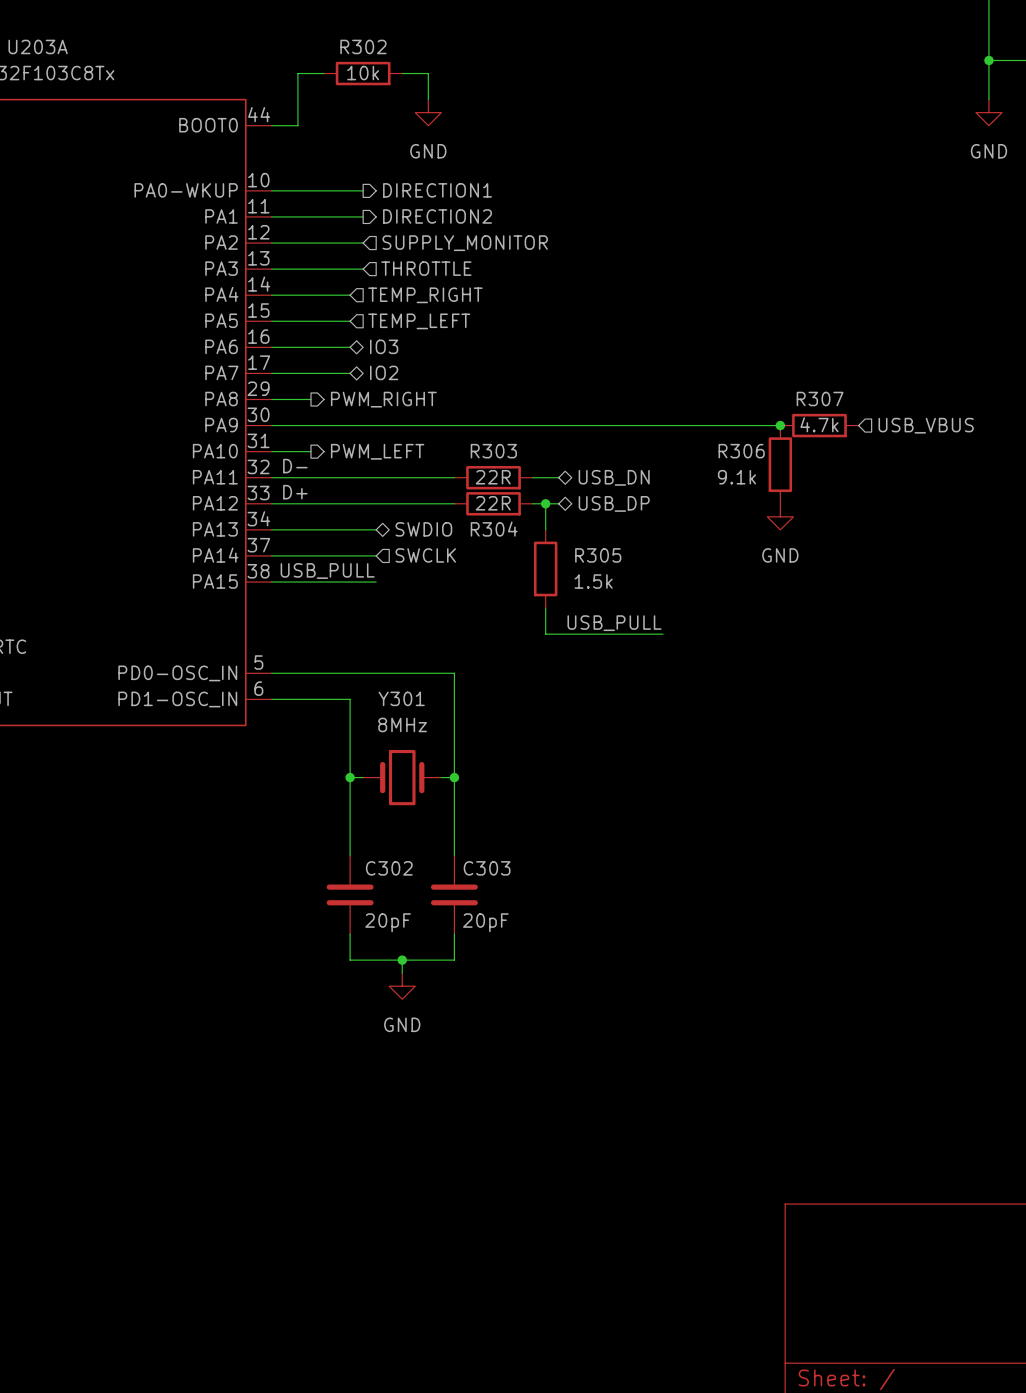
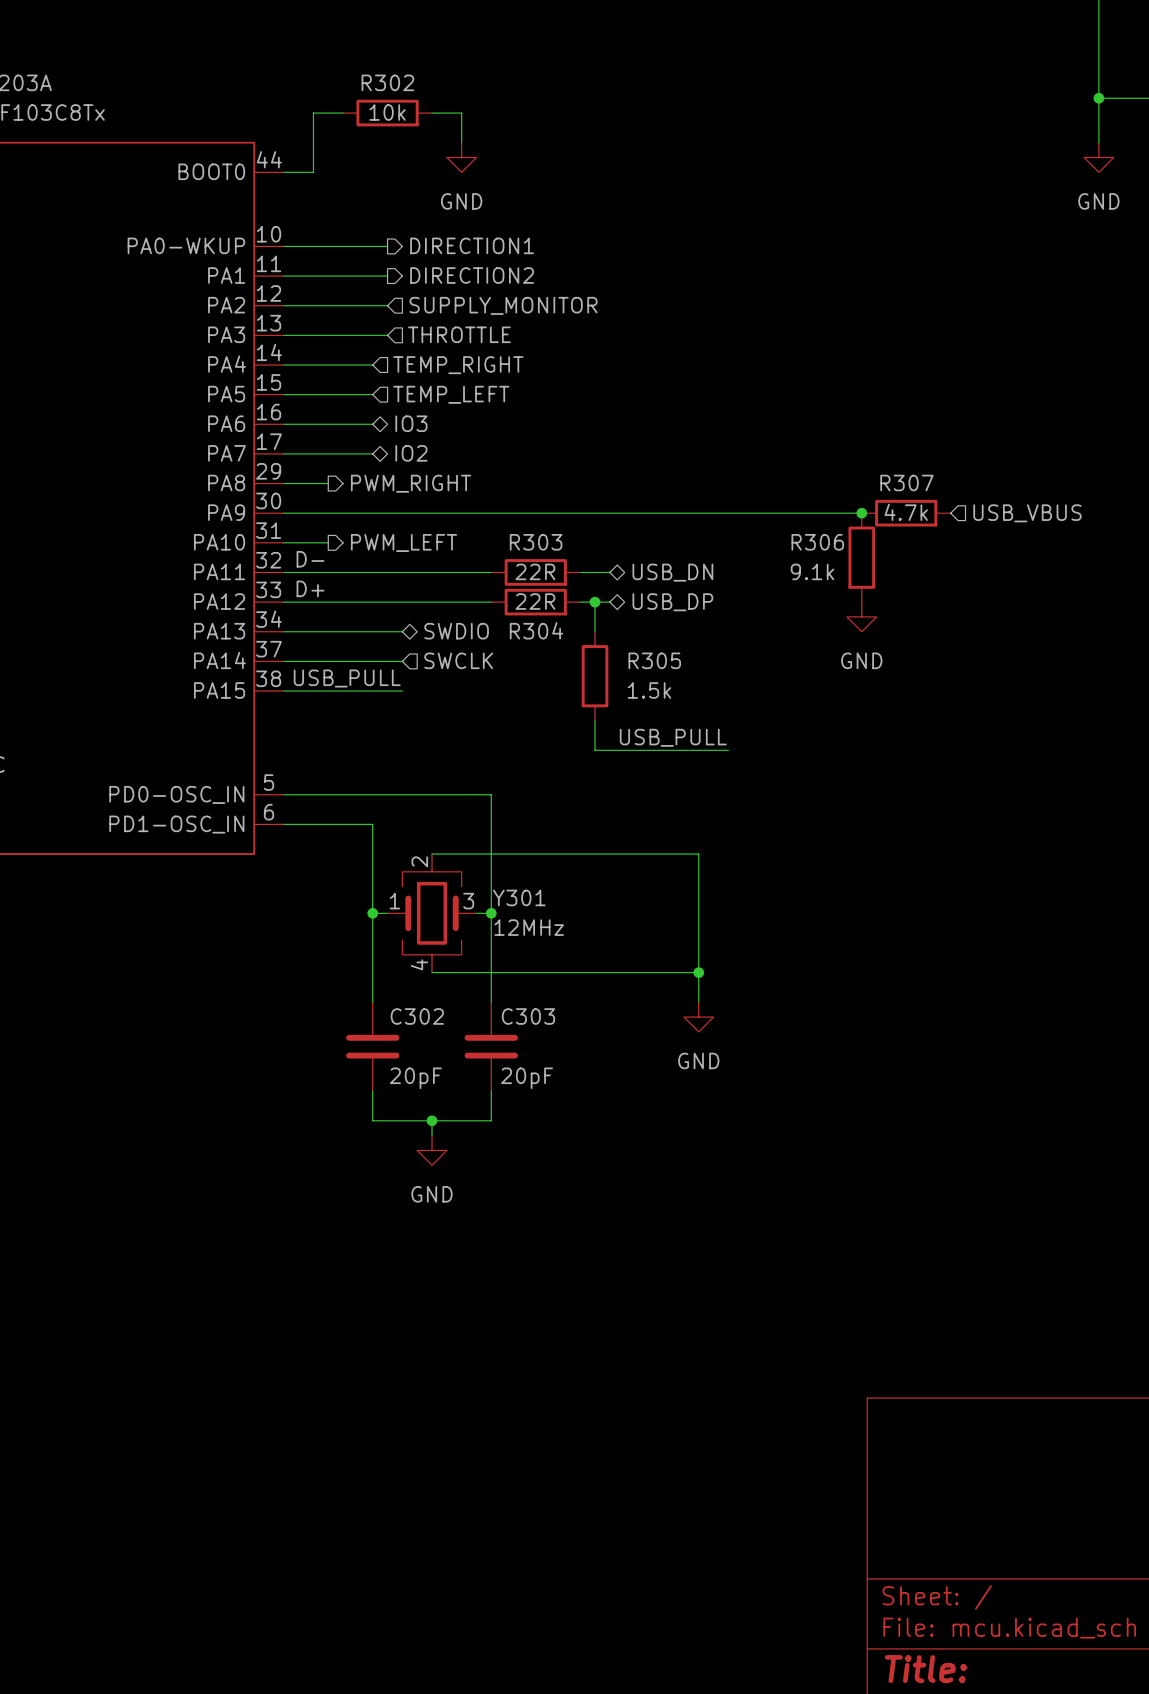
Y301 name position: Y301 (401, 698) -> Y301 (519, 897)
Y301 value: 8MHz (402, 724) -> 12MHz (529, 927)
wire: none -> (432, 854) (698, 854) (698, 1002)
Y301 symbol: [363, 749, 442, 806] -> [387, 854, 477, 973]
wire: none -> (432, 972) (698, 972)
junction: none -> (698, 972)
power symbol: none -> GND (698, 1017)

